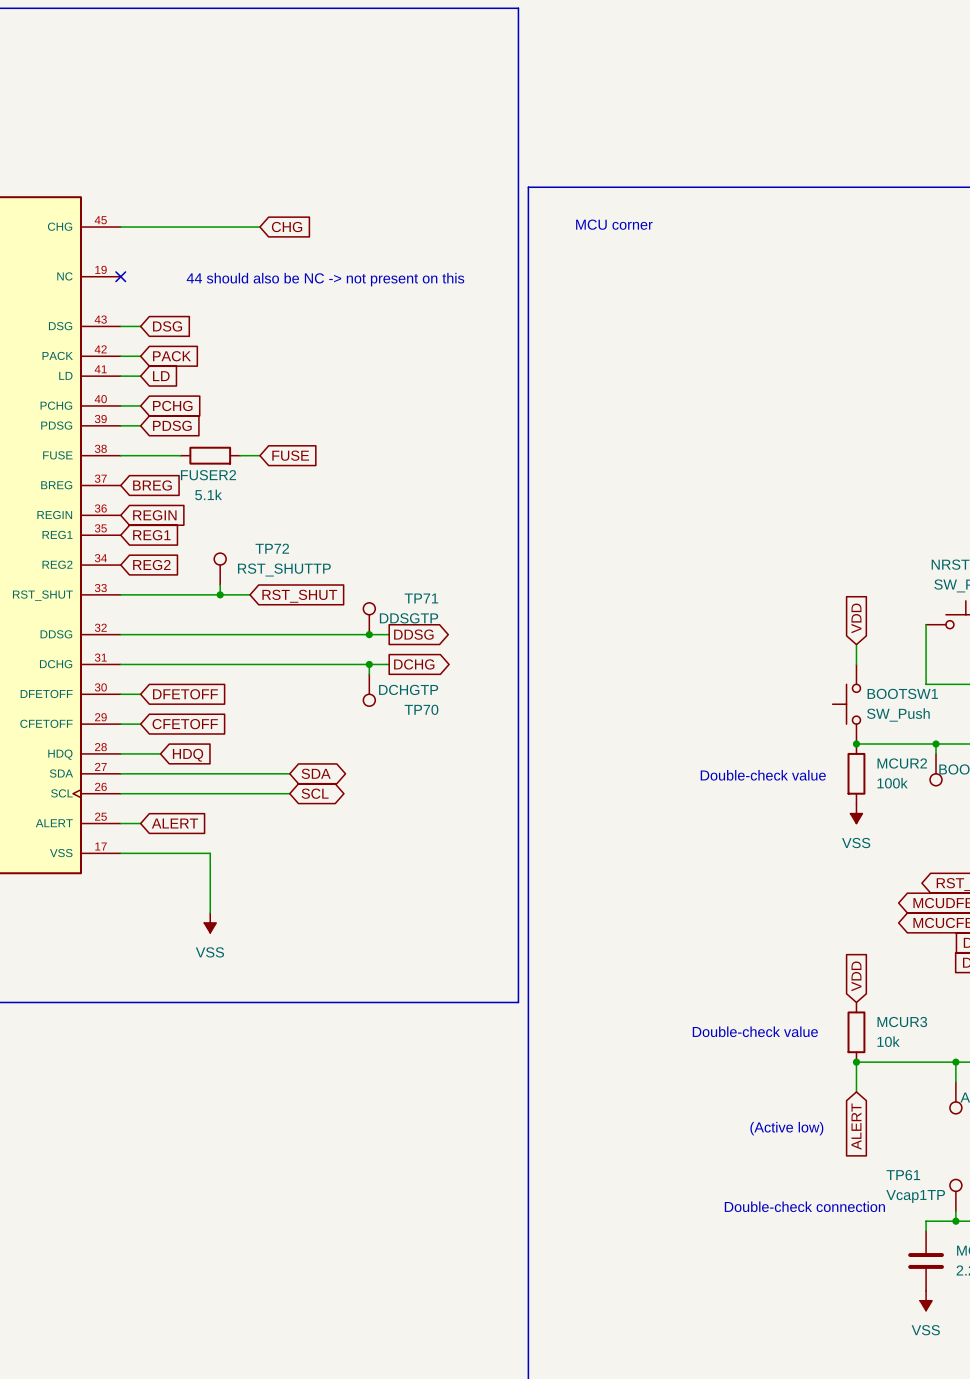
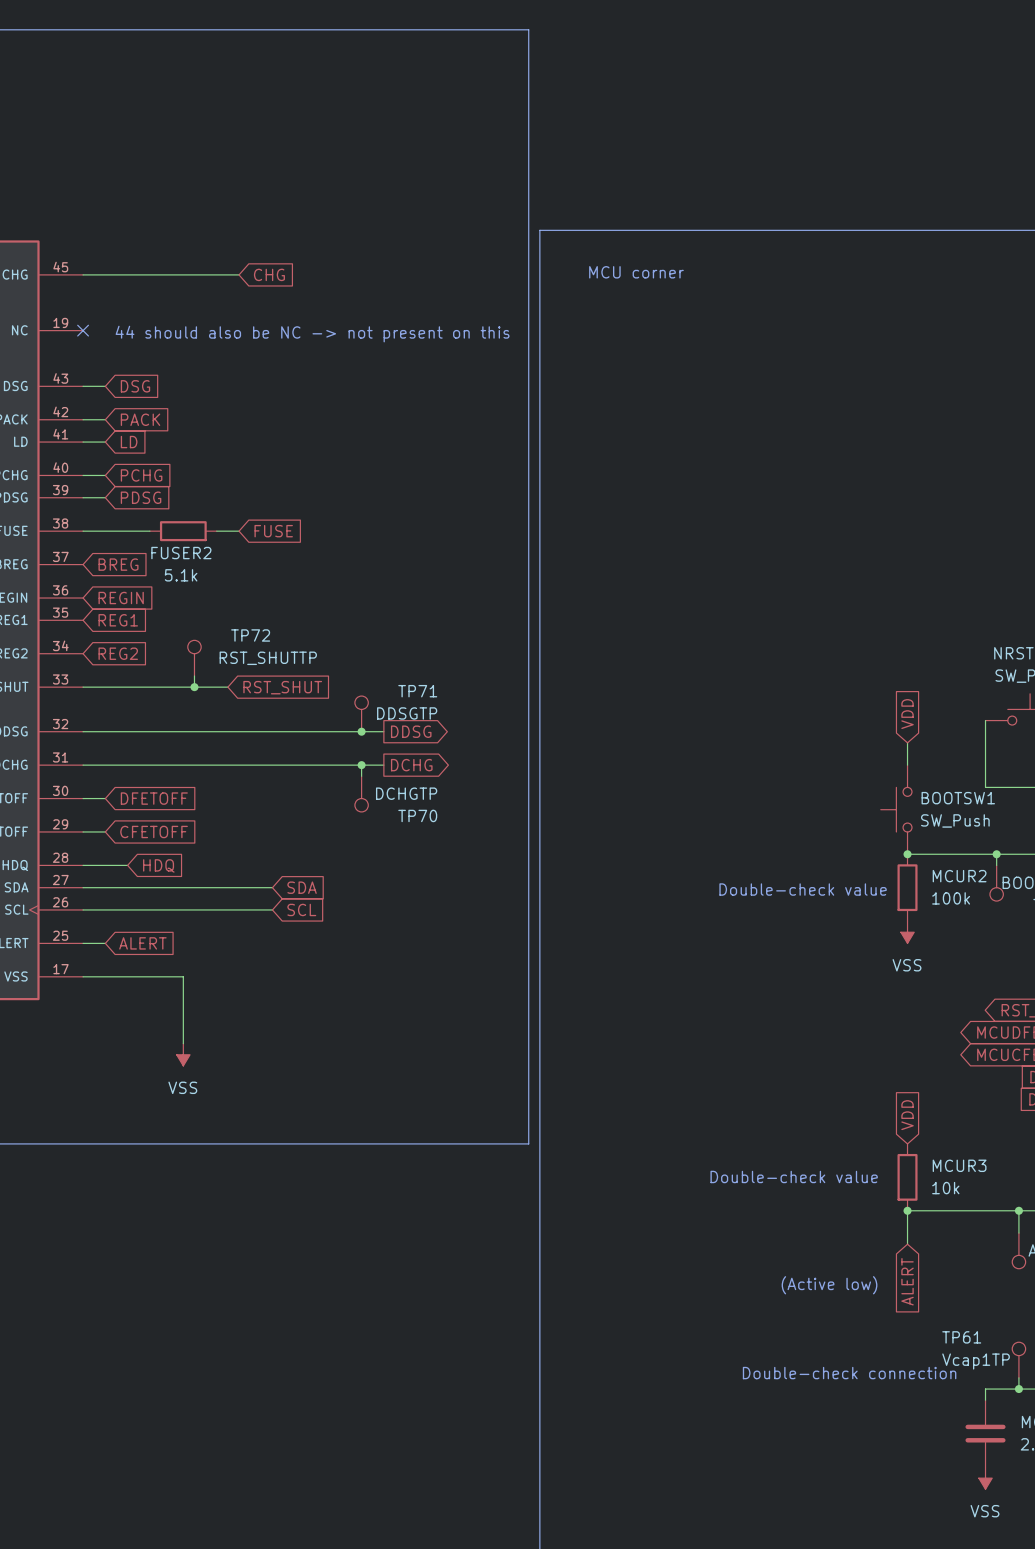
global label shape: bidirectional (316, 773) -> input (302, 887)
global label shape: bidirectional (315, 793) -> input (301, 909)

